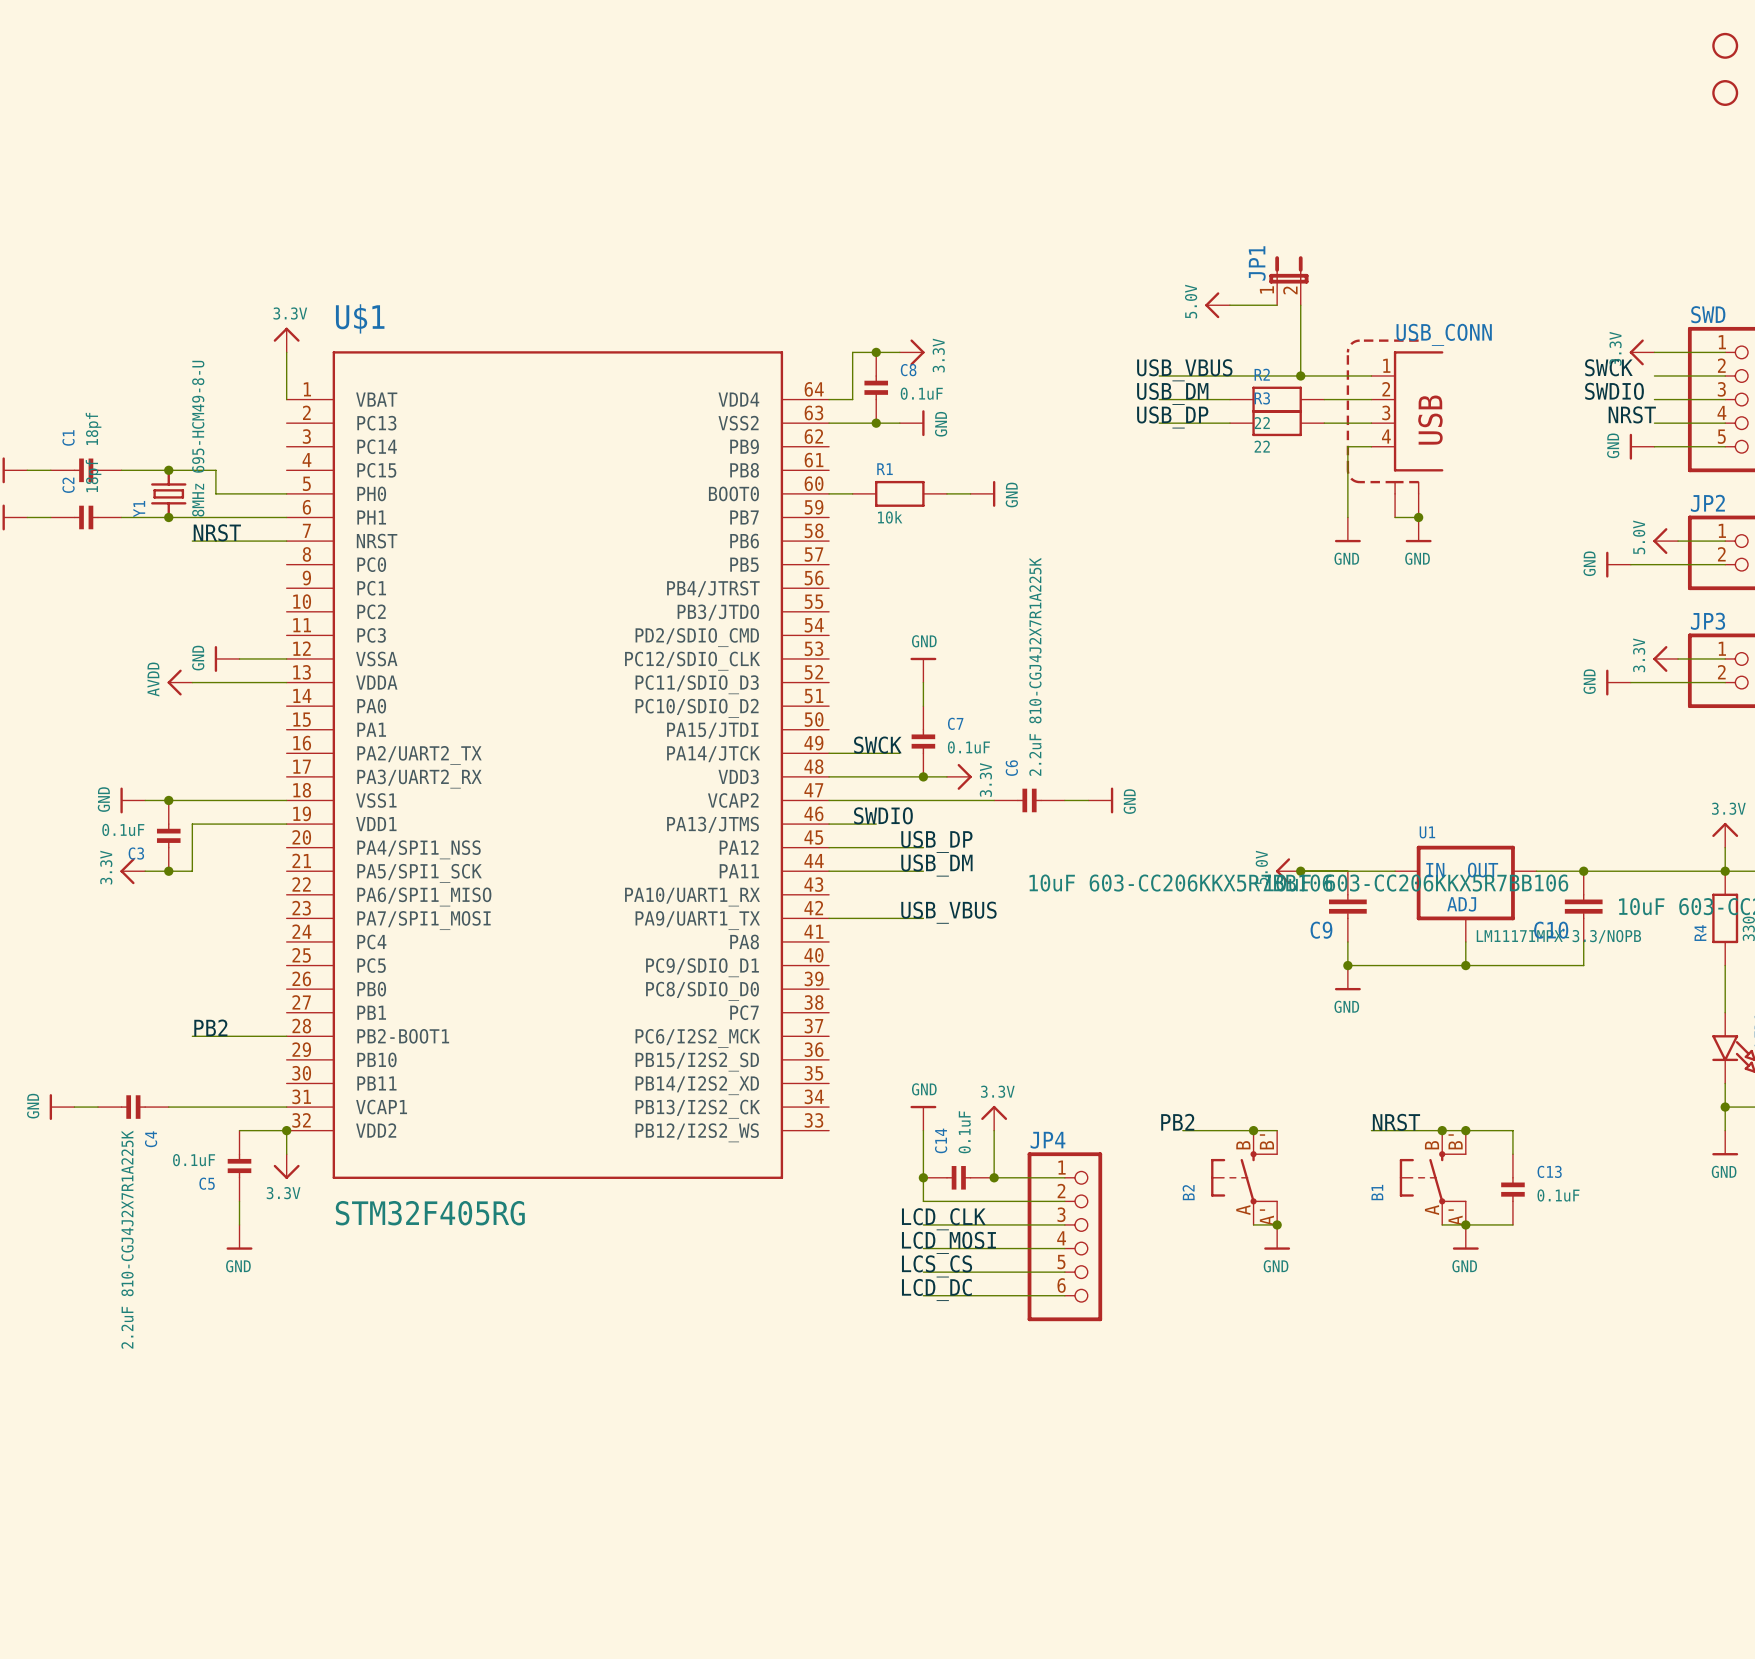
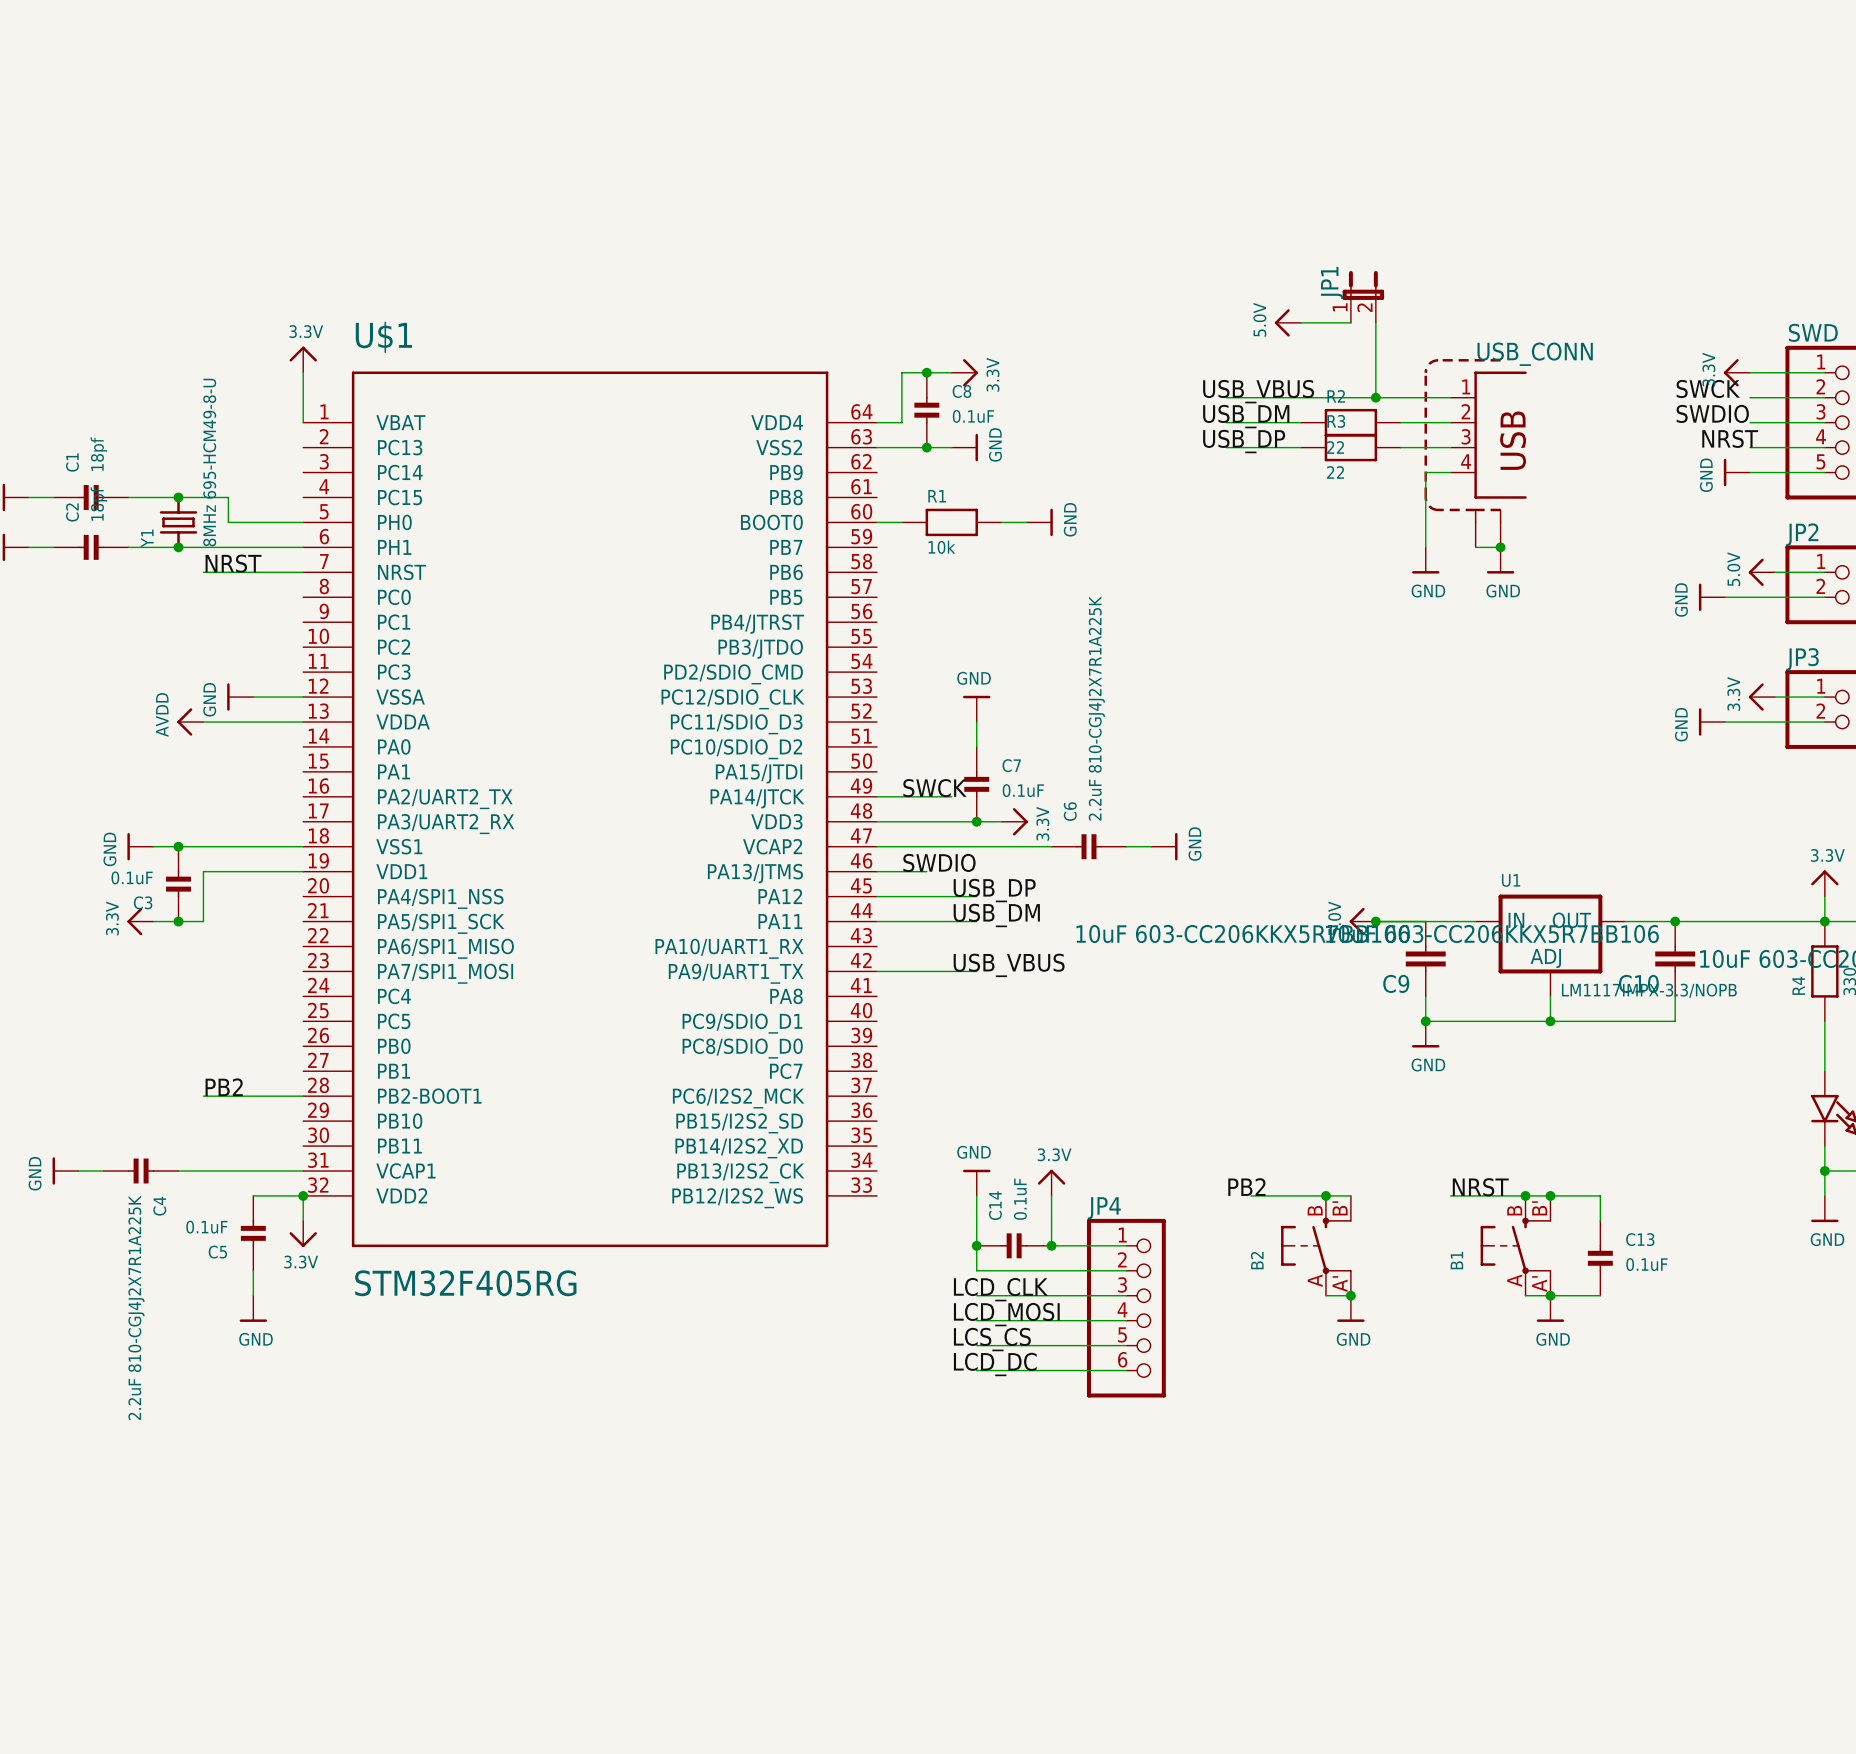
part: (1725, 45) -> none
part: (1725, 93) -> none

